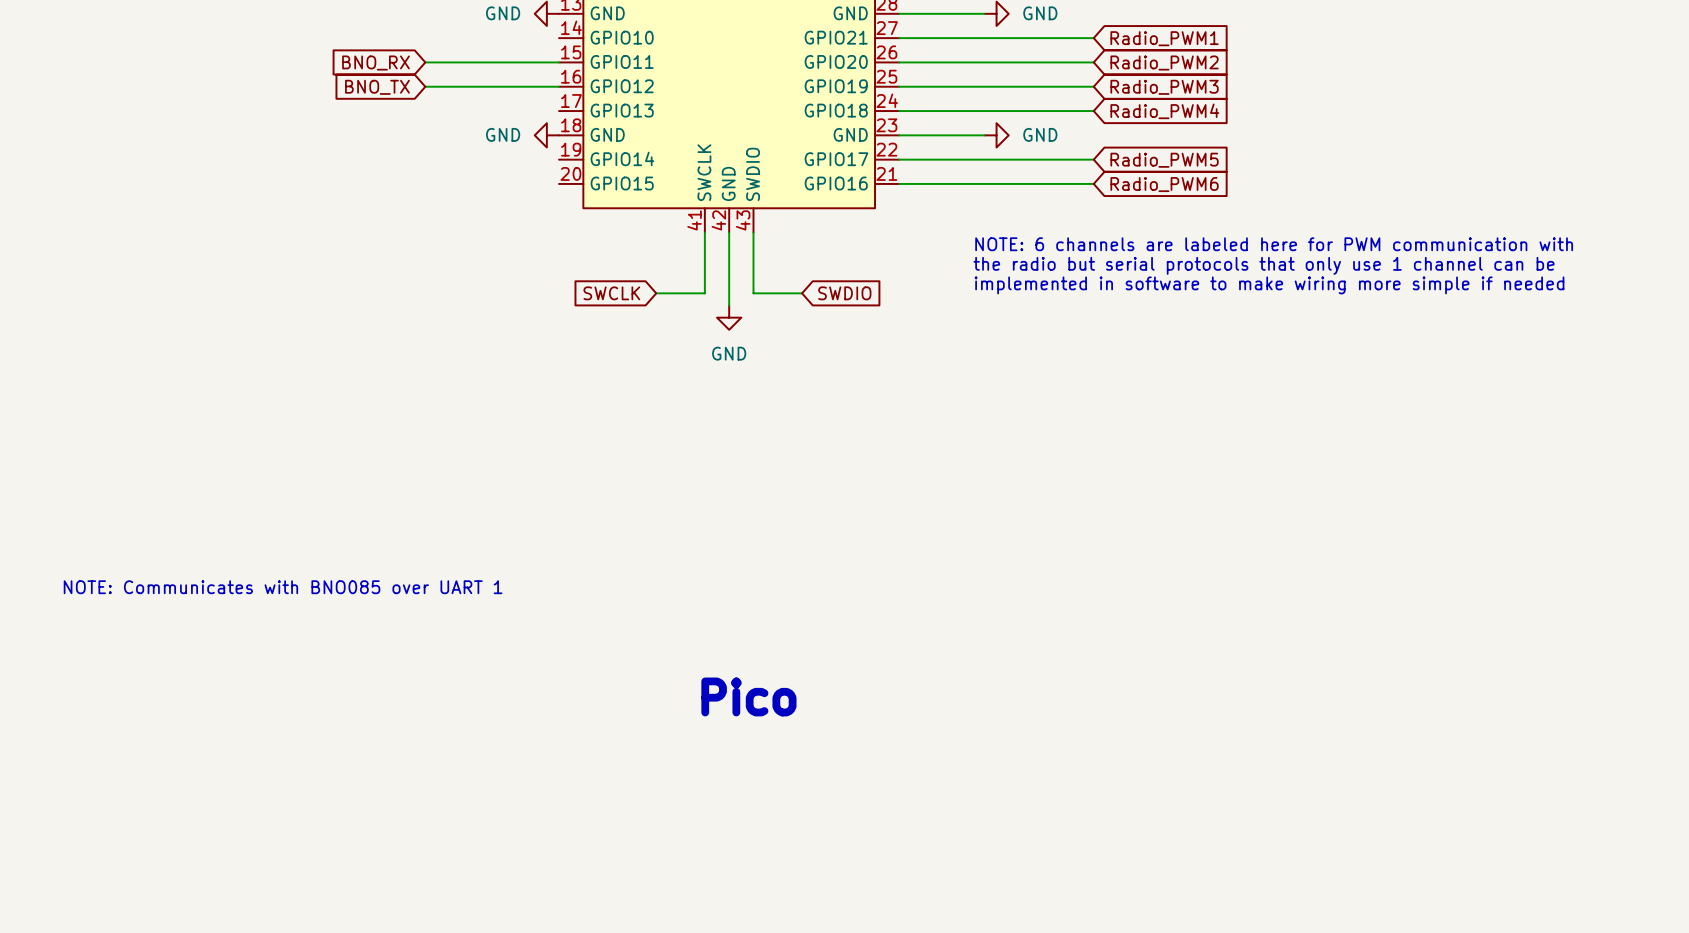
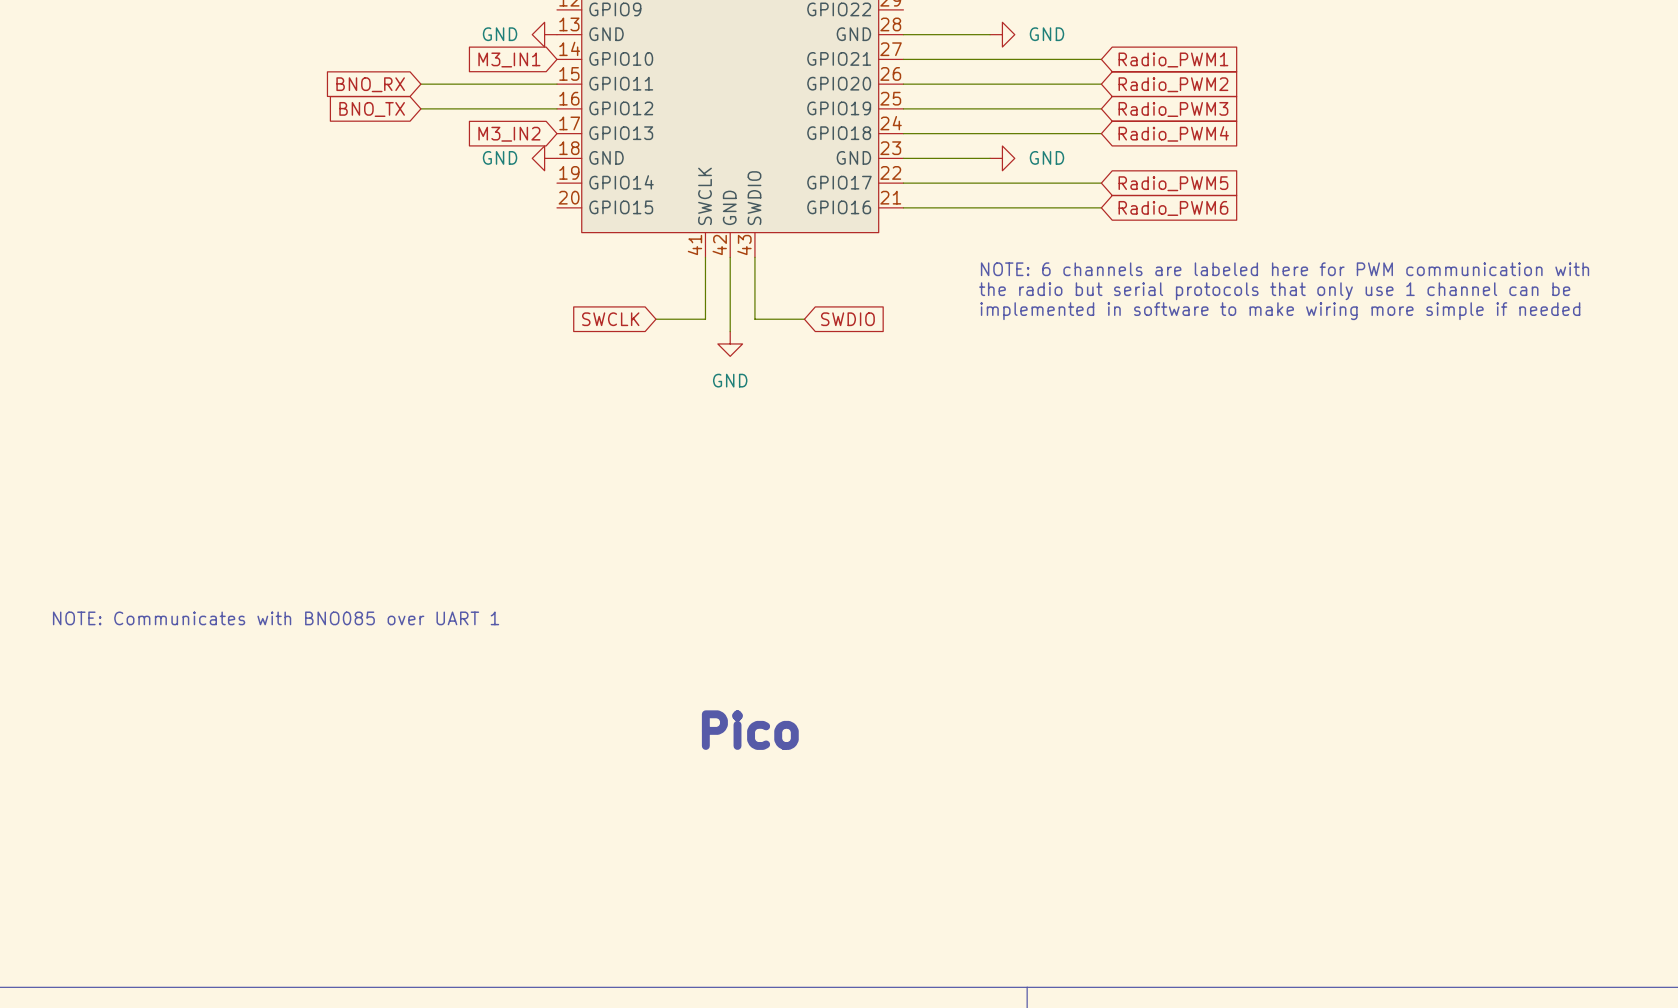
global label: none -> M3_IN1 (509, 59)
global label: none -> M3_IN2 (509, 134)

